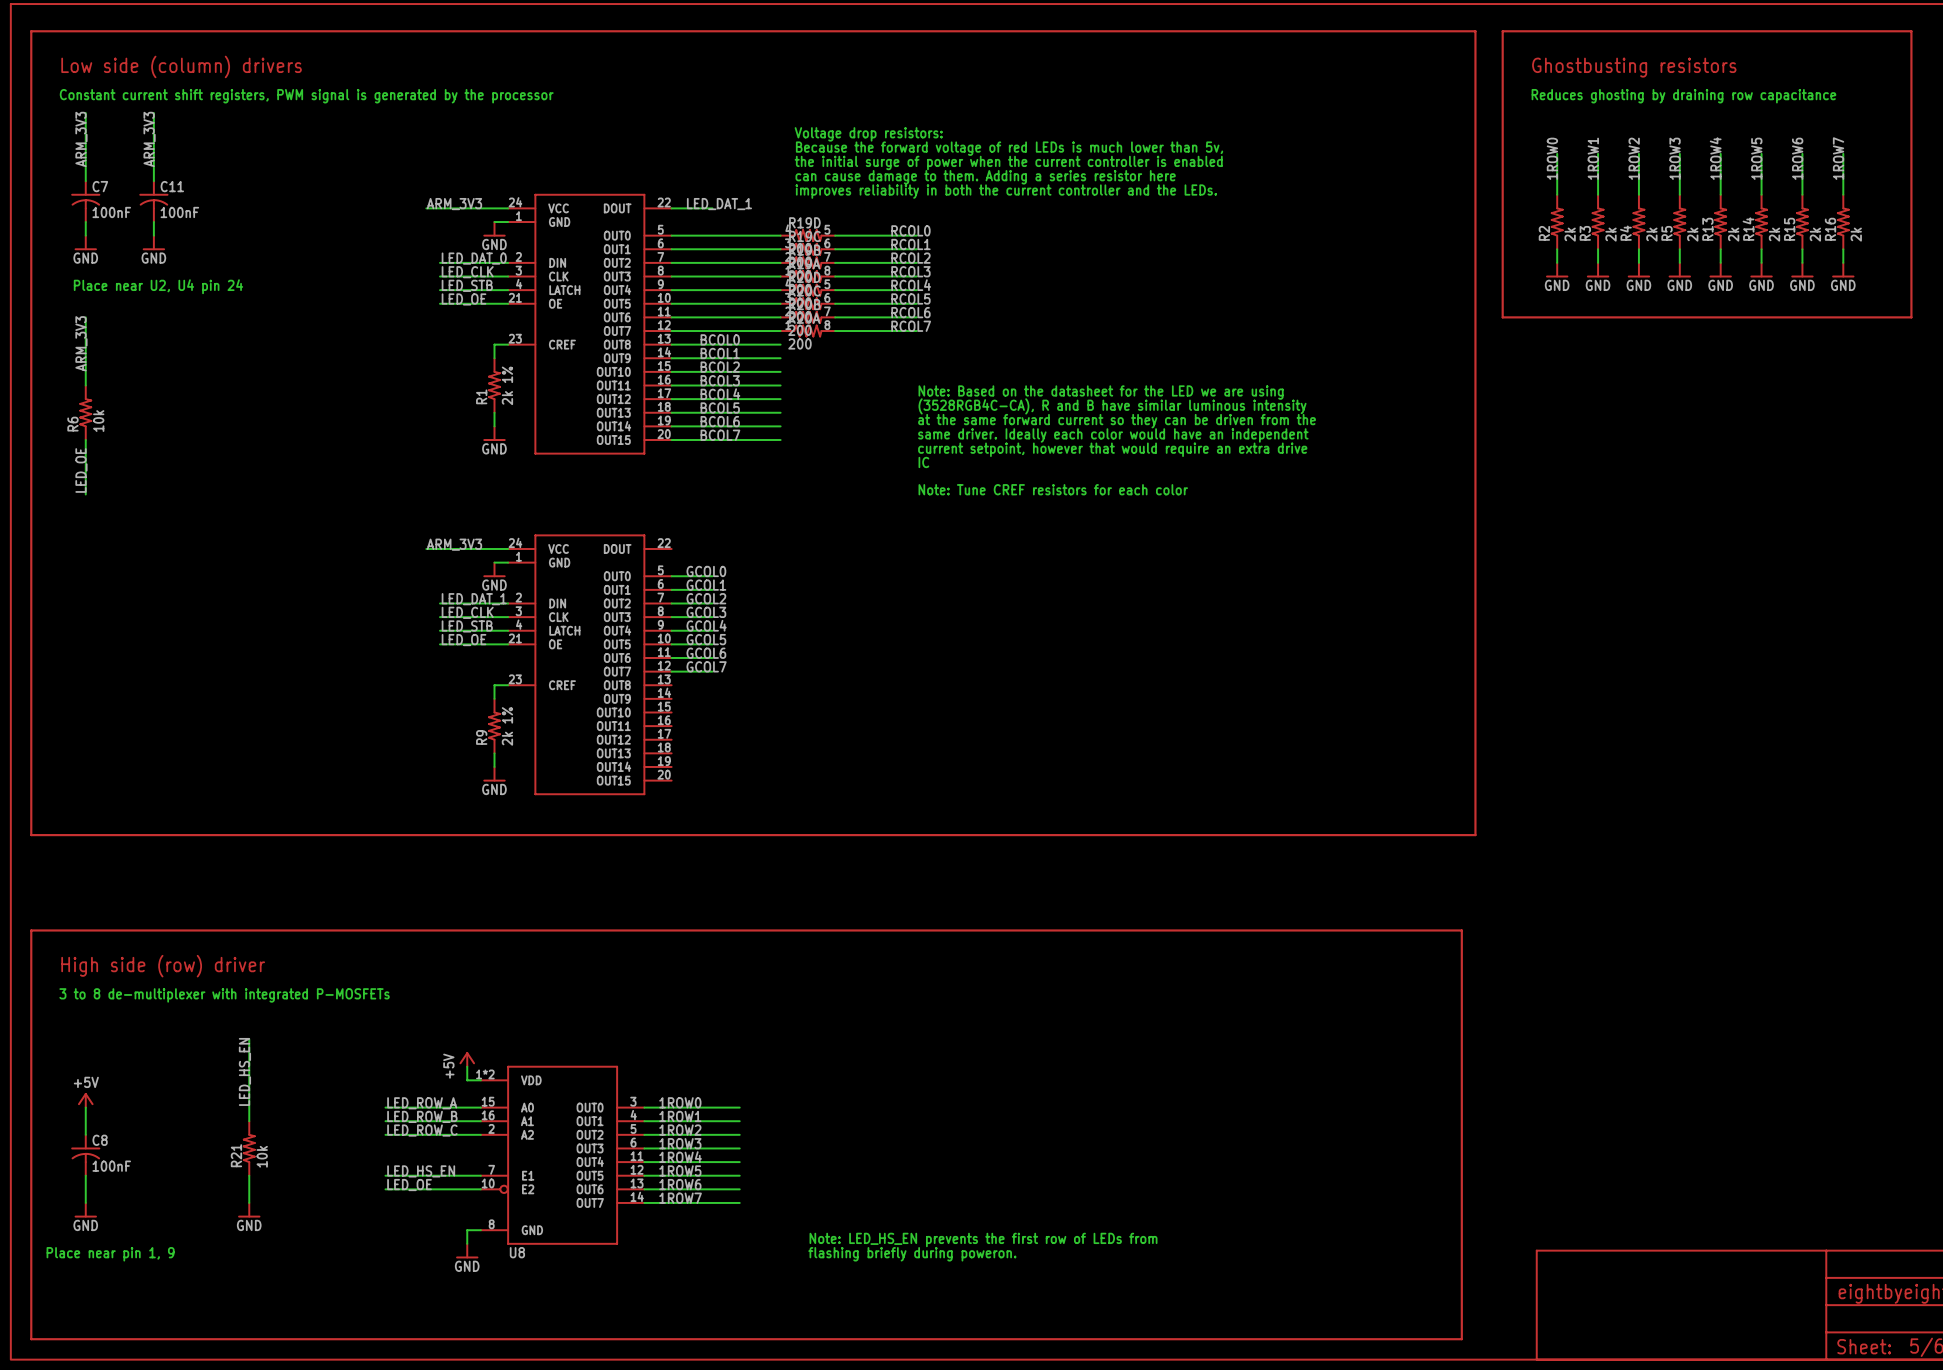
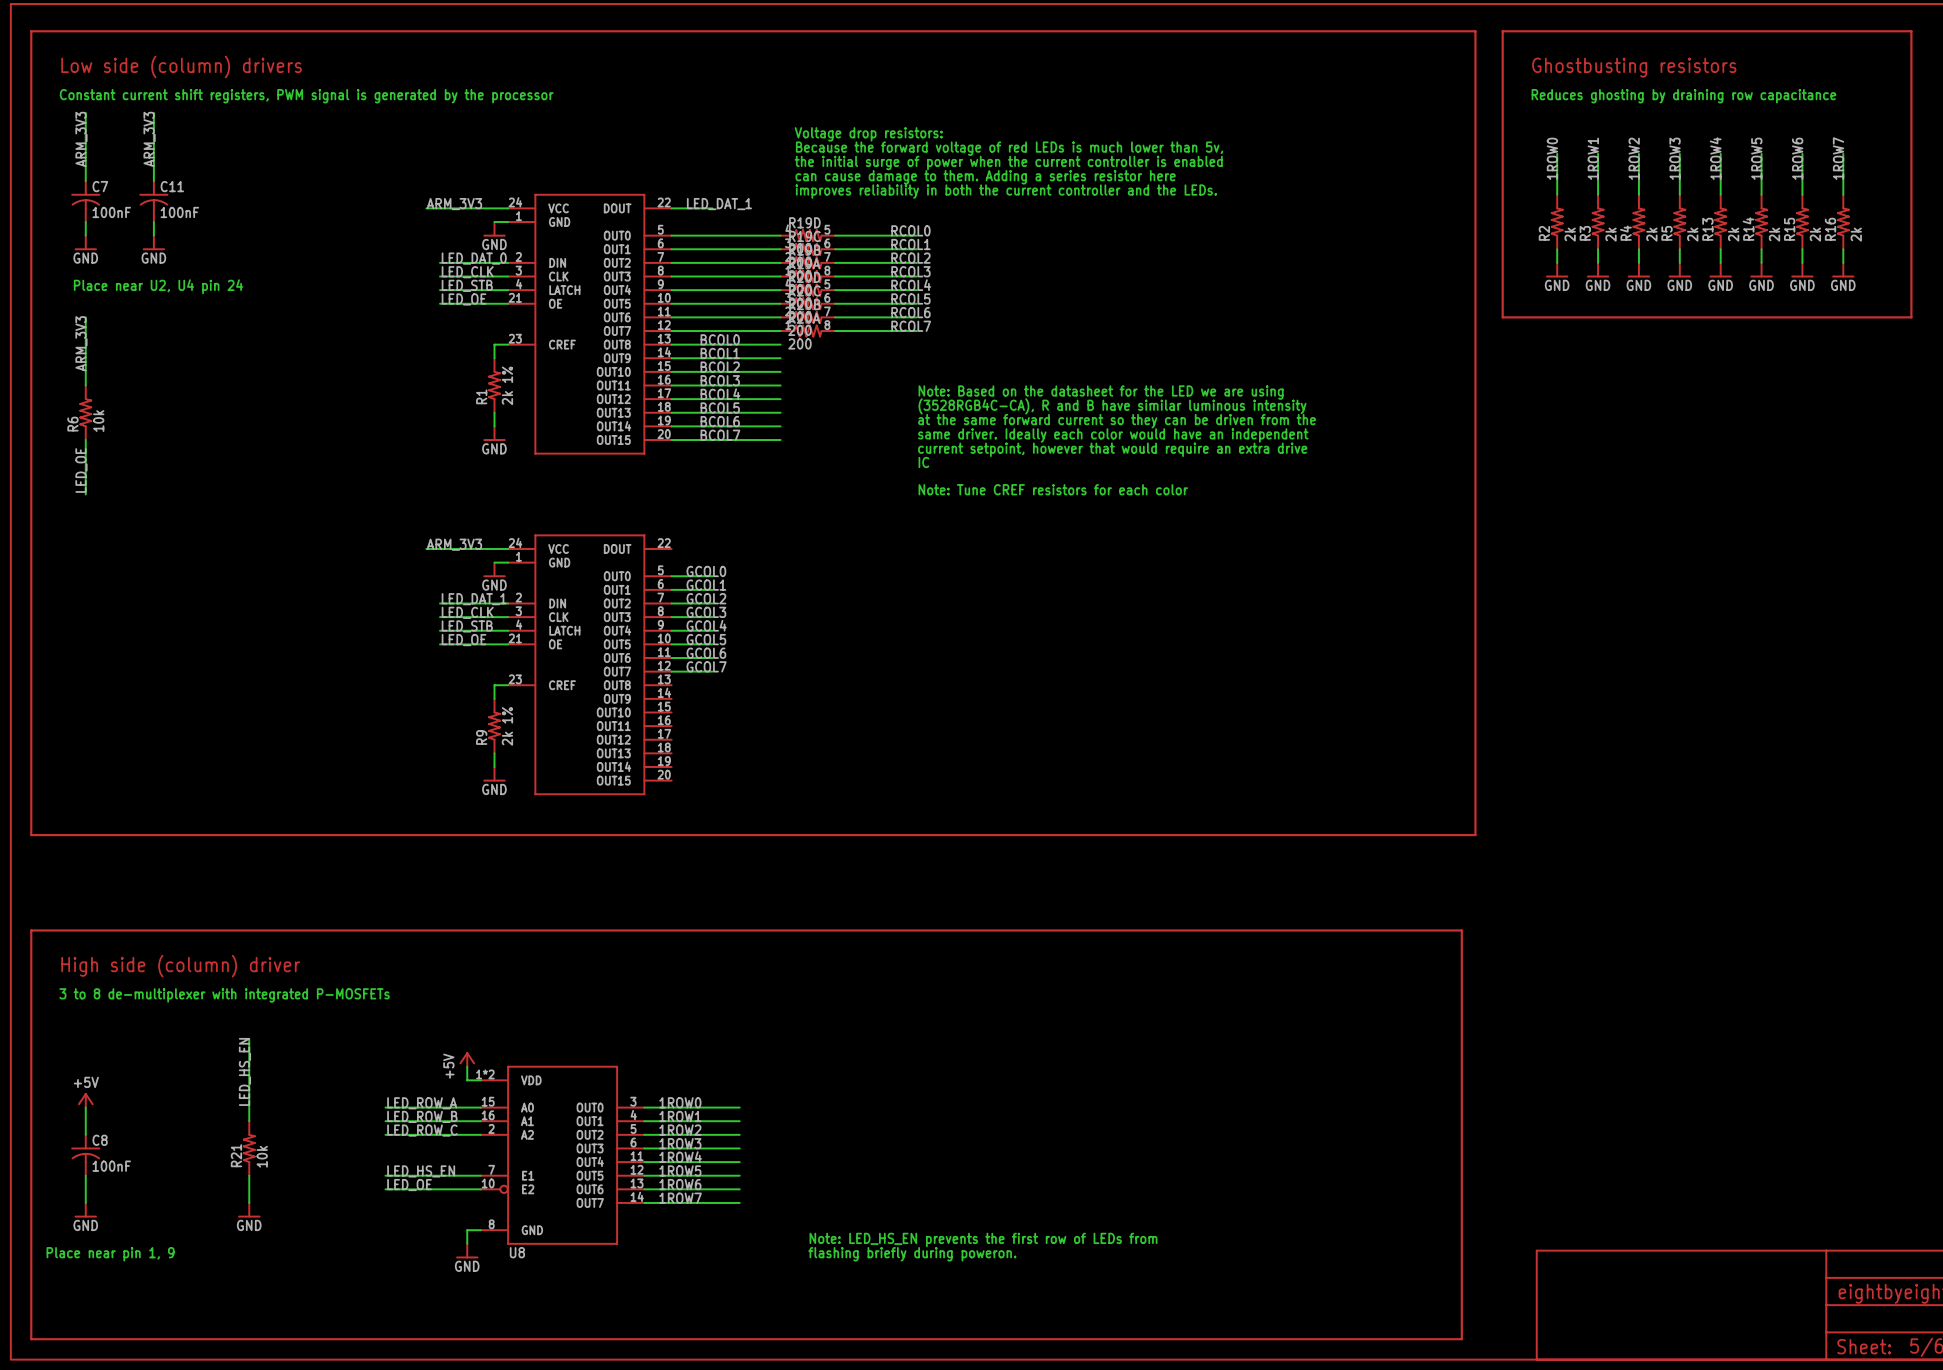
text: High side (row) driver (163, 966) -> High side (column) driver (180, 966)

